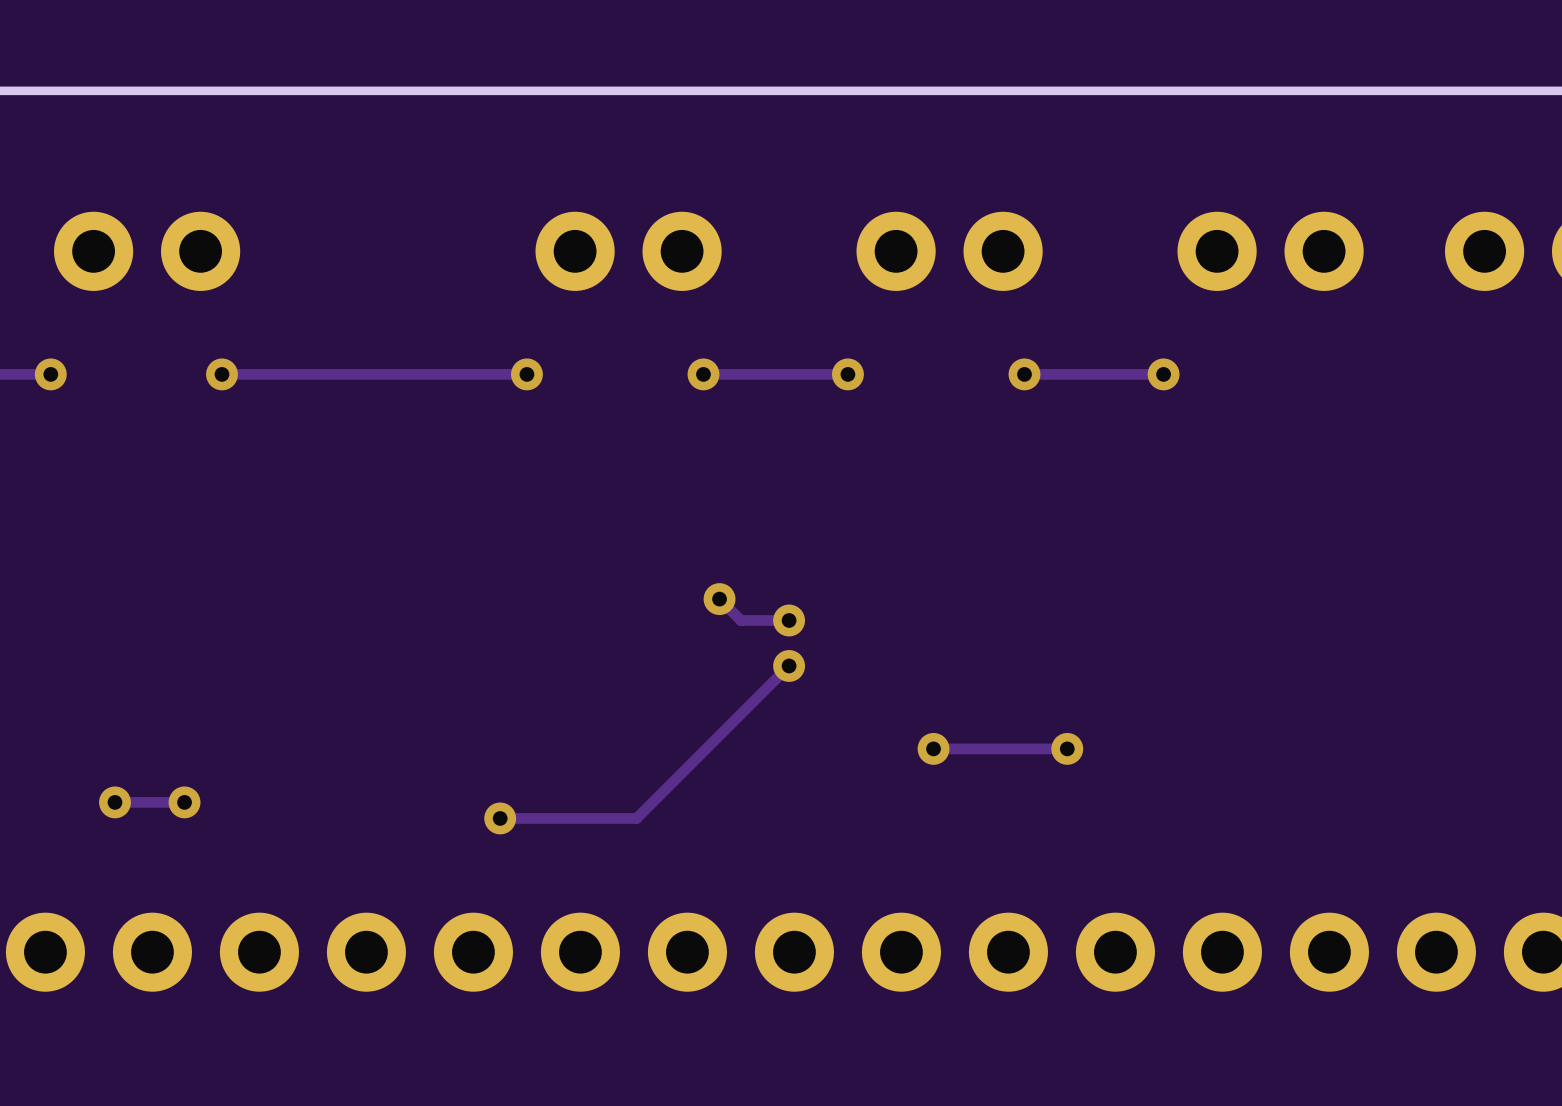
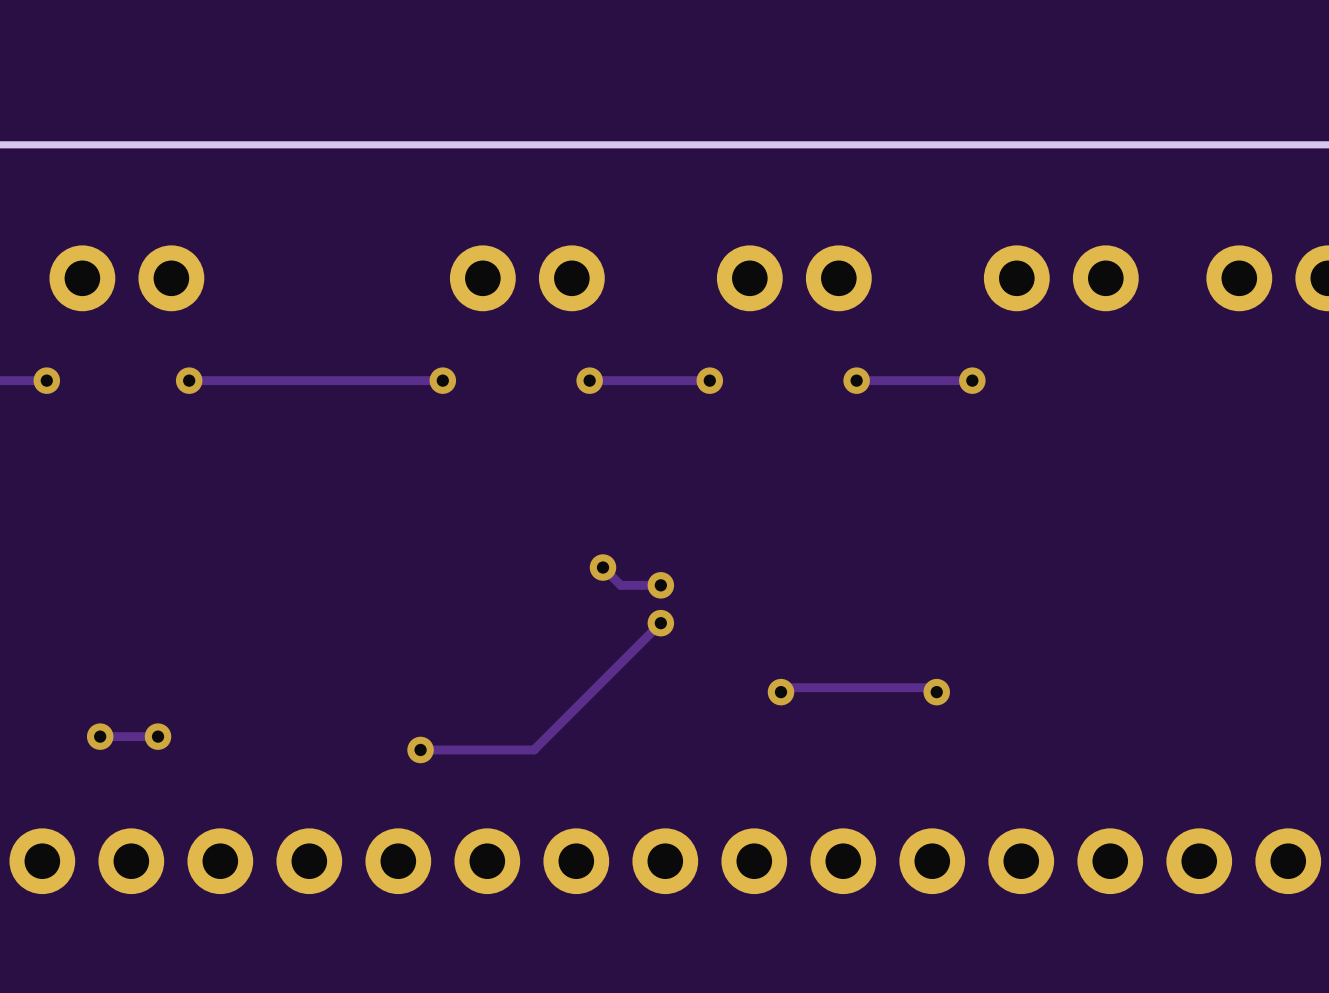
track: (1067, 748) (933, 748) -> (936, 692) (932, 687) (785, 687) (780, 692)
via position: (1067, 748) -> (936, 692)

